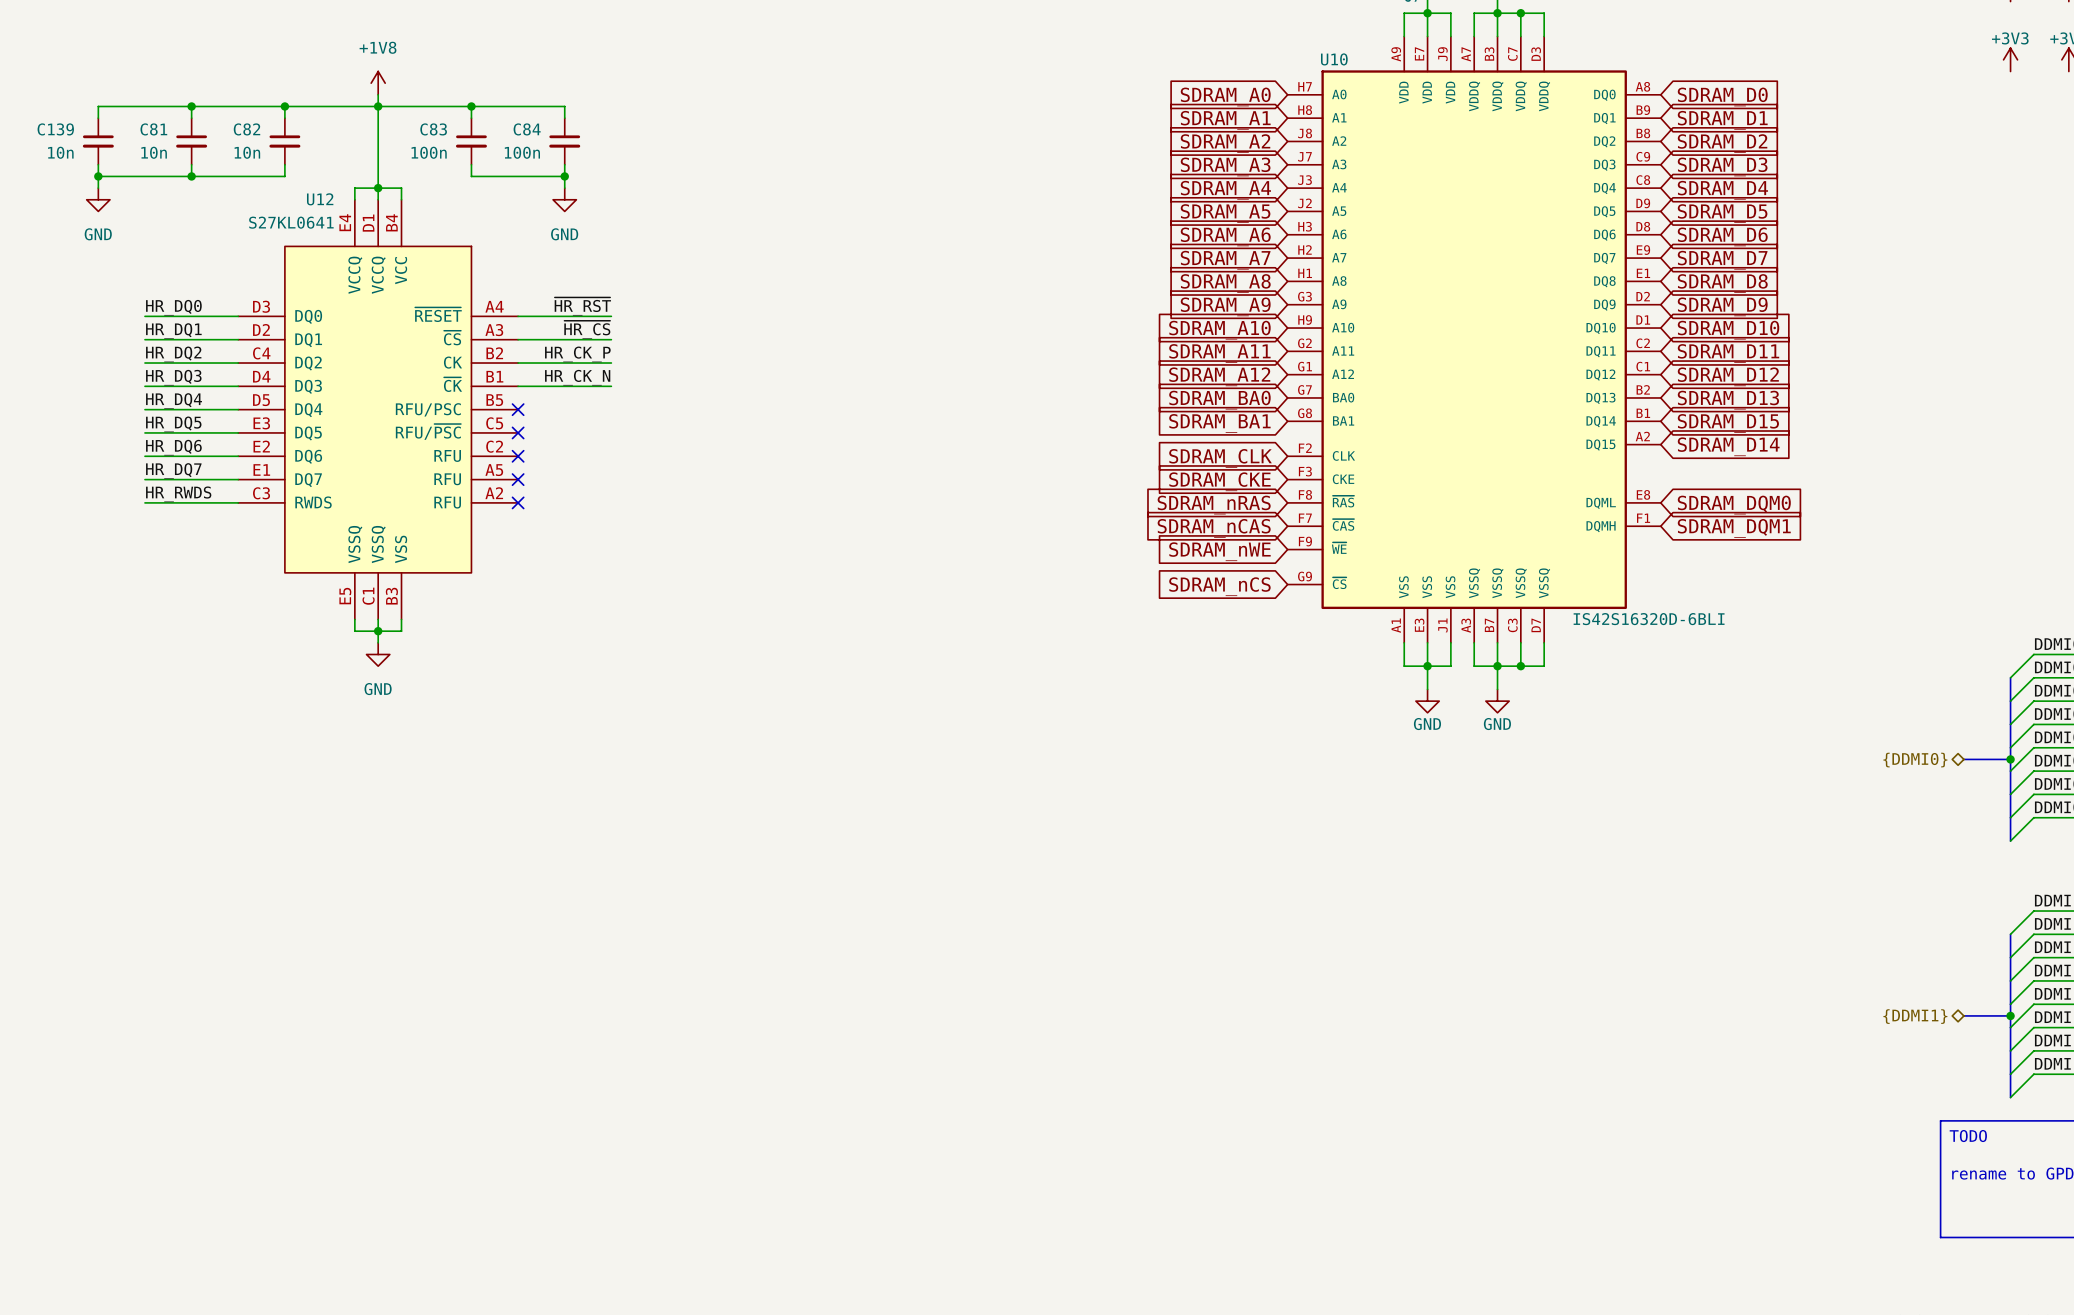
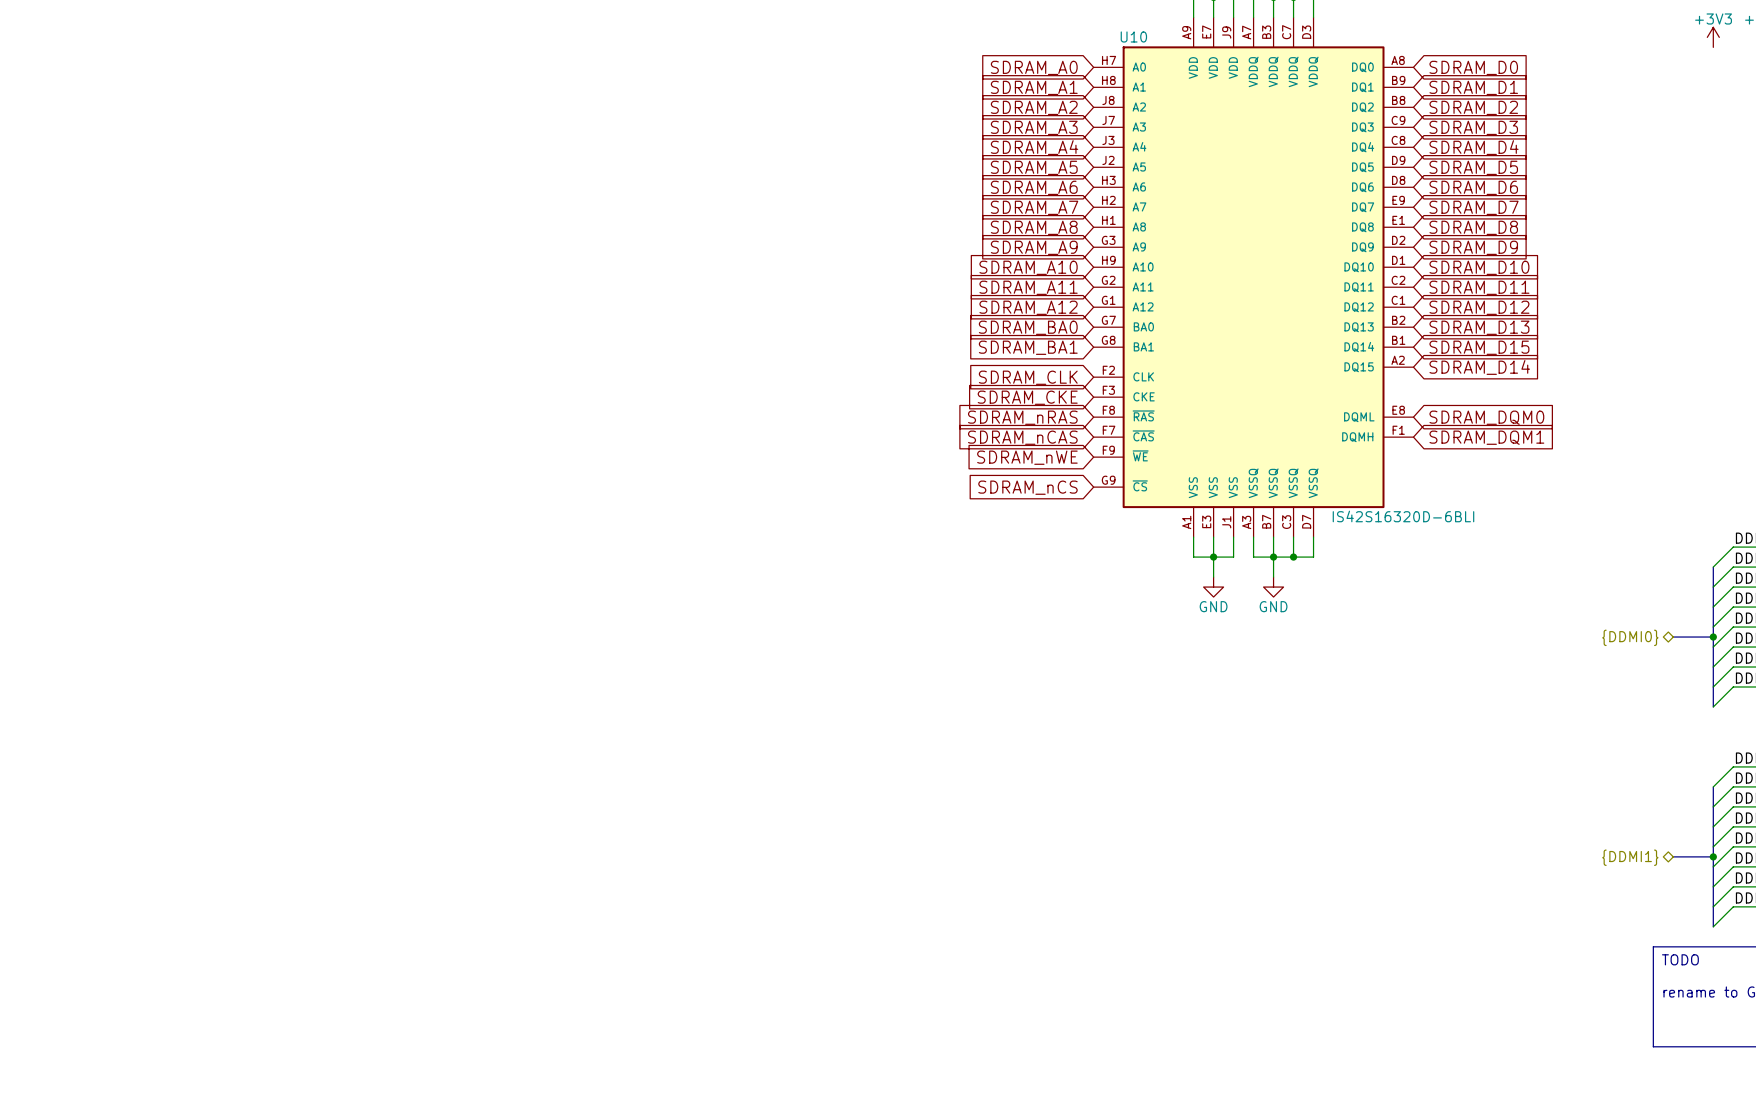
power symbol: +1V8 (378, 83) -> none
wire: (378, 94) (378, 199) -> none
wire: (191, 106) (191, 118) -> none
junction: (191, 106) -> none
wire: (284, 106) (284, 118) -> none
junction: (284, 106) -> none
junction: (378, 106) -> none
wire: (471, 106) (471, 118) -> none
junction: (471, 106) -> none
wire: (98, 118) (98, 106) (564, 106) (564, 118) -> none
C139: 10n (98, 141) -> none
C81: 10n (191, 141) -> none
C82: 10n (284, 141) -> none
C83: 100n (471, 141) -> none
C84: 100n (564, 141) -> none
wire: (98, 164) (98, 188) -> none
wire: (191, 164) (191, 176) -> none
wire: (284, 164) (284, 176) (98, 176) -> none
wire: (471, 164) (471, 176) (564, 176) -> none
wire: (564, 164) (564, 188) -> none
junction: (98, 176) -> none
junction: (191, 176) -> none
junction: (564, 176) -> none
junction: (378, 188) -> none
power symbol: GND (98, 199) -> none
wire: (354, 199) (354, 188) (401, 188) (401, 199) -> none
power symbol: GND (564, 199) -> none
label: ~{HR_RST} (582, 306) -> none
label: HR_DQ0 (173, 307) -> none
wire: (144, 316) (238, 316) -> none
wire: (518, 316) (611, 316) -> none
label: ~{HR_CS} (587, 329) -> none
label: HR_DQ1 (173, 331) -> none
wire: (144, 339) (238, 339) -> none
wire: (518, 339) (611, 339) -> none
label: HR_DQ2 (173, 354) -> none
label: HR_CK_P (577, 354) -> none
wire: (144, 363) (238, 363) -> none
wire: (518, 363) (611, 363) -> none
label: HR_DQ3 (173, 377) -> none
label: HR_CK_N (577, 377) -> none
wire: (144, 386) (238, 386) -> none
wire: (518, 386) (611, 386) -> none
label: HR_DQ4 (174, 401) -> none
wire: (144, 409) (238, 409) -> none
U12: S27KL0641 (378, 409) -> none
no-connect mark: (518, 409) -> none
label: HR_DQ5 (173, 424) -> none
wire: (144, 432) (238, 432) -> none
no-connect mark: (518, 432) -> none
label: HR_DQ6 (173, 447) -> none
wire: (144, 456) (238, 456) -> none
no-connect mark: (518, 456) -> none
label: HR_DQ7 (173, 470) -> none
wire: (144, 479) (238, 479) -> none
no-connect mark: (518, 479) -> none
label: HR_RWDS (178, 494) -> none
wire: (144, 502) (238, 502) -> none
no-connect mark: (518, 502) -> none
wire: (354, 619) (354, 631) (401, 631) (401, 619) -> none
wire: (378, 619) (378, 642) -> none
junction: (378, 631) -> none
power symbol: GND (378, 654) -> none

